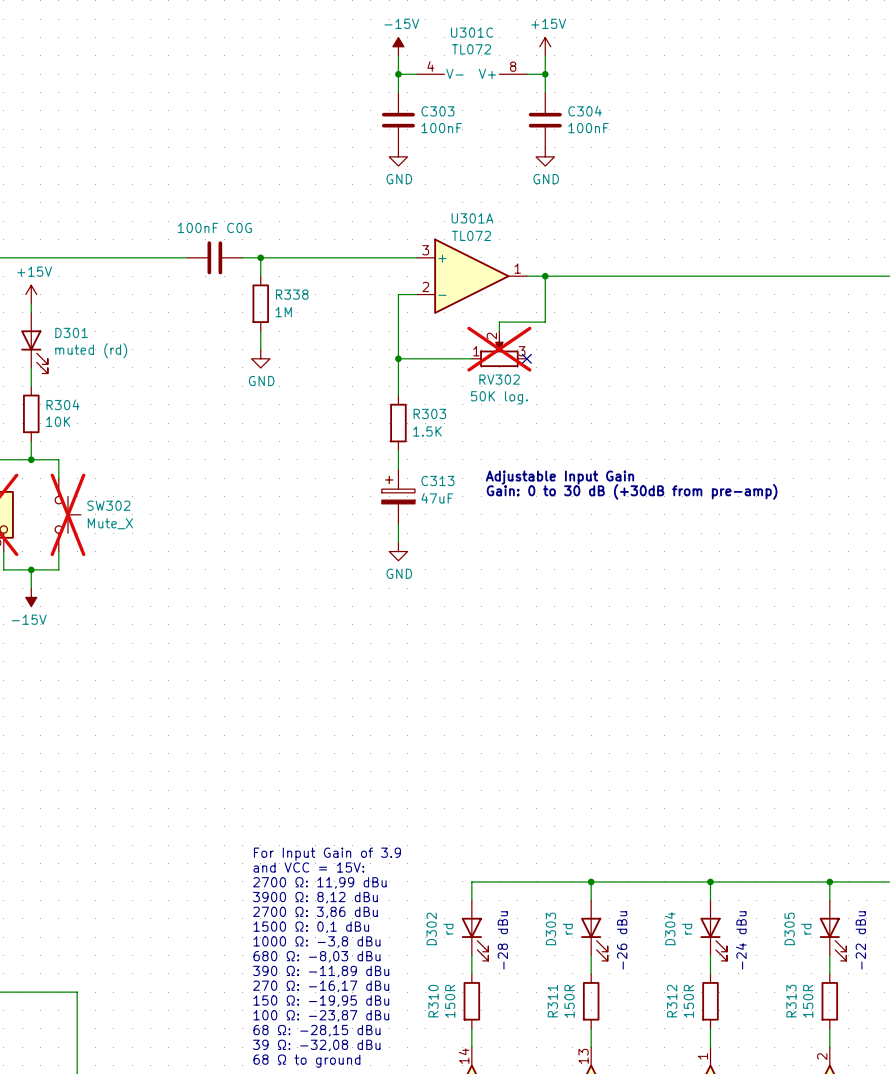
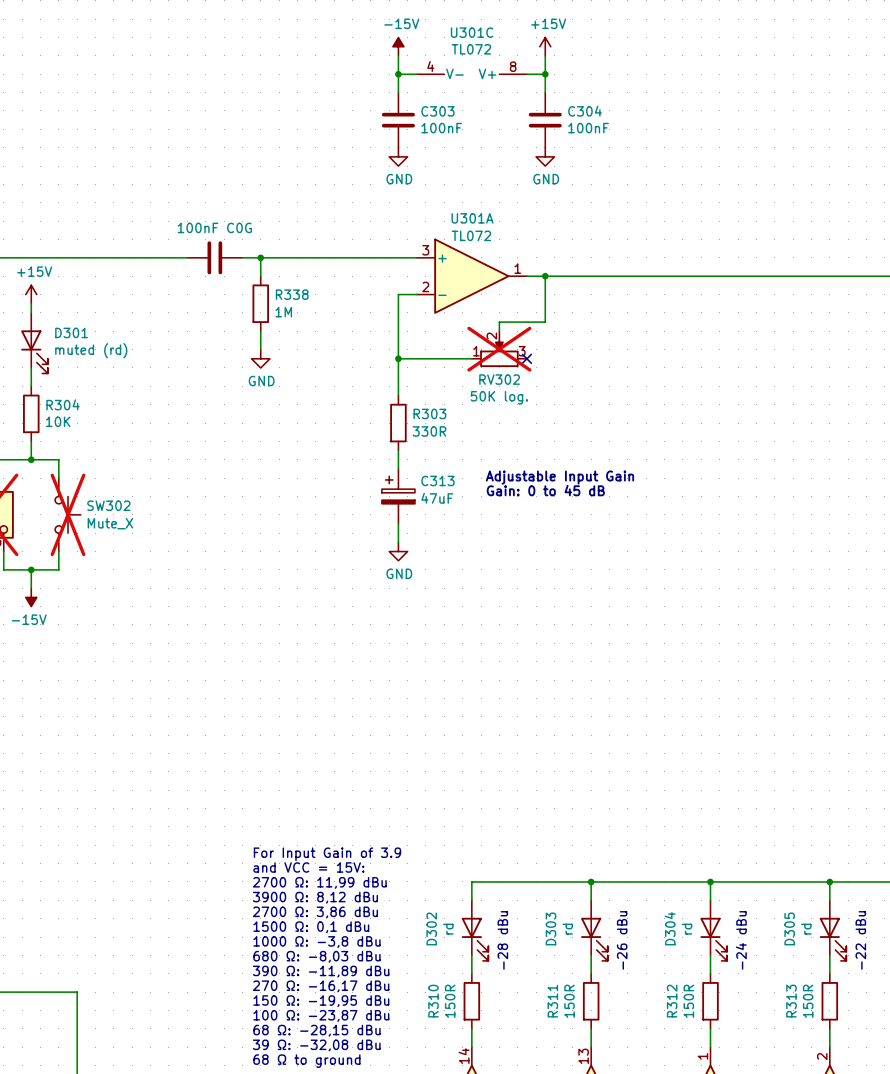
R303 value: 1.5K (427, 431) -> 330R (429, 431)
text: Gain: 0 to 30 dB (+30dB from pre-amp) (632, 491) -> Gain: 0 to 45 dB (545, 490)

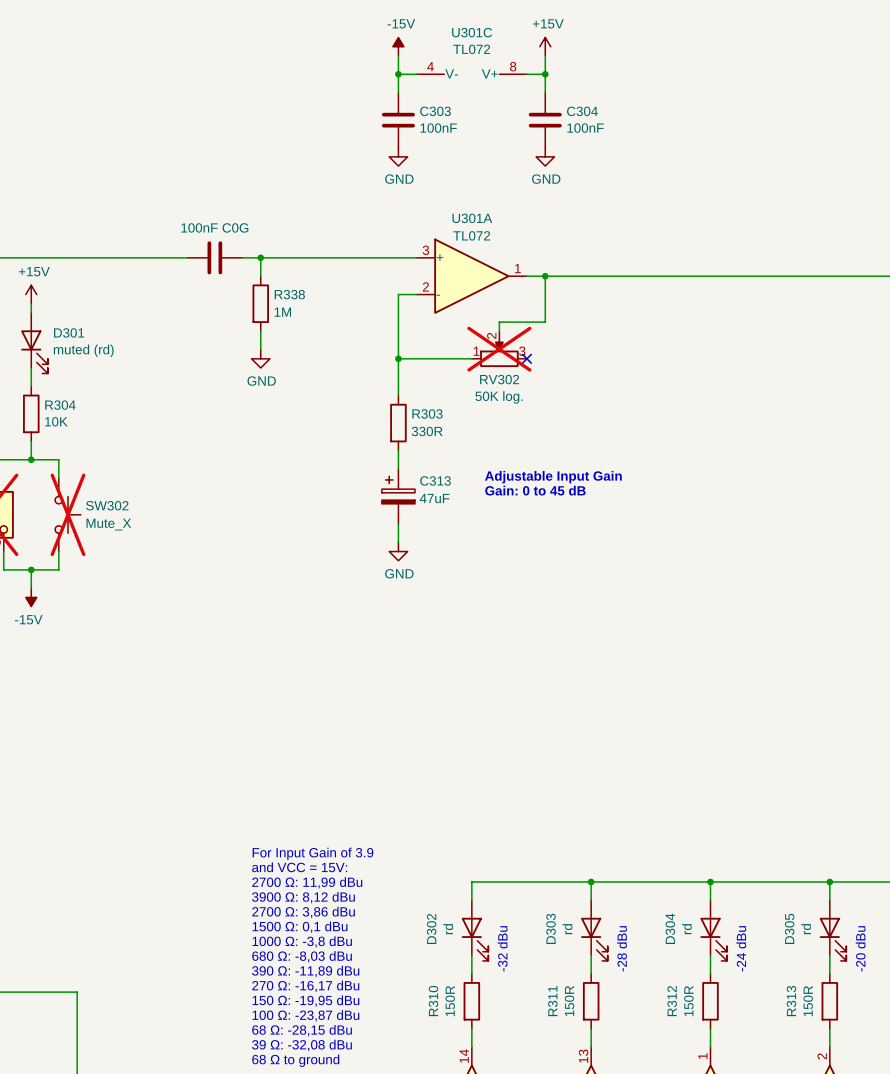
text: -28 dBu (502, 940) -> -32 dBu (502, 948)
text: -26 dBu (622, 940) -> -28 dBu (621, 948)
text: -22 dBu (860, 940) -> -20 dBu (860, 948)

